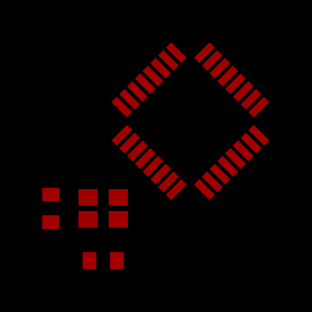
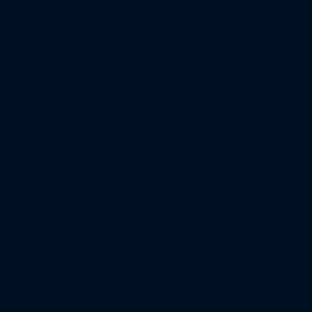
part: (190, 121) -> none
part: (50, 208) -> none
part: (103, 208) -> none
part: (103, 260) -> none

